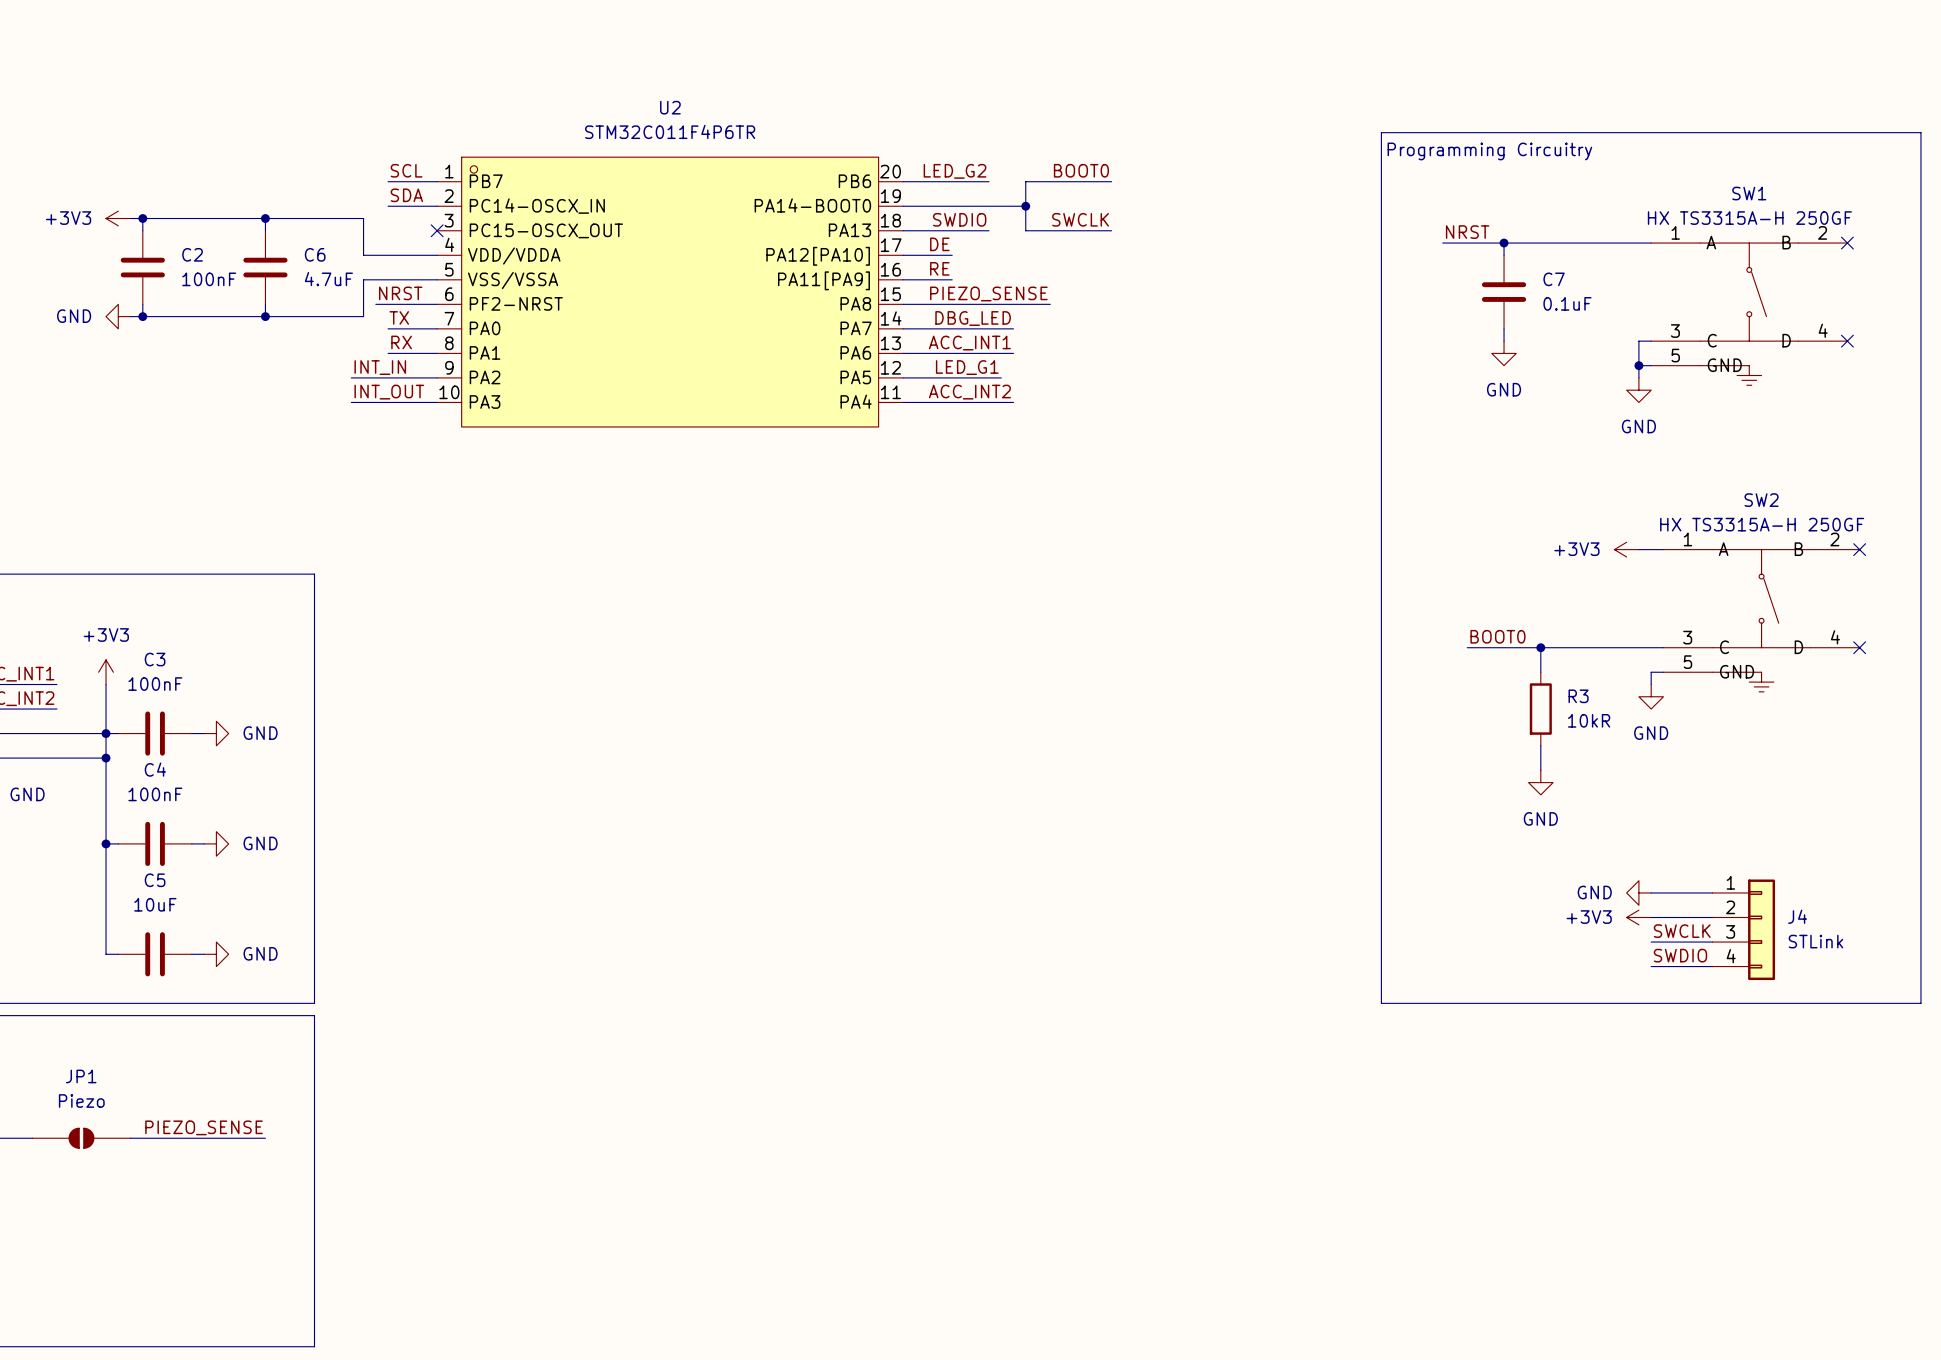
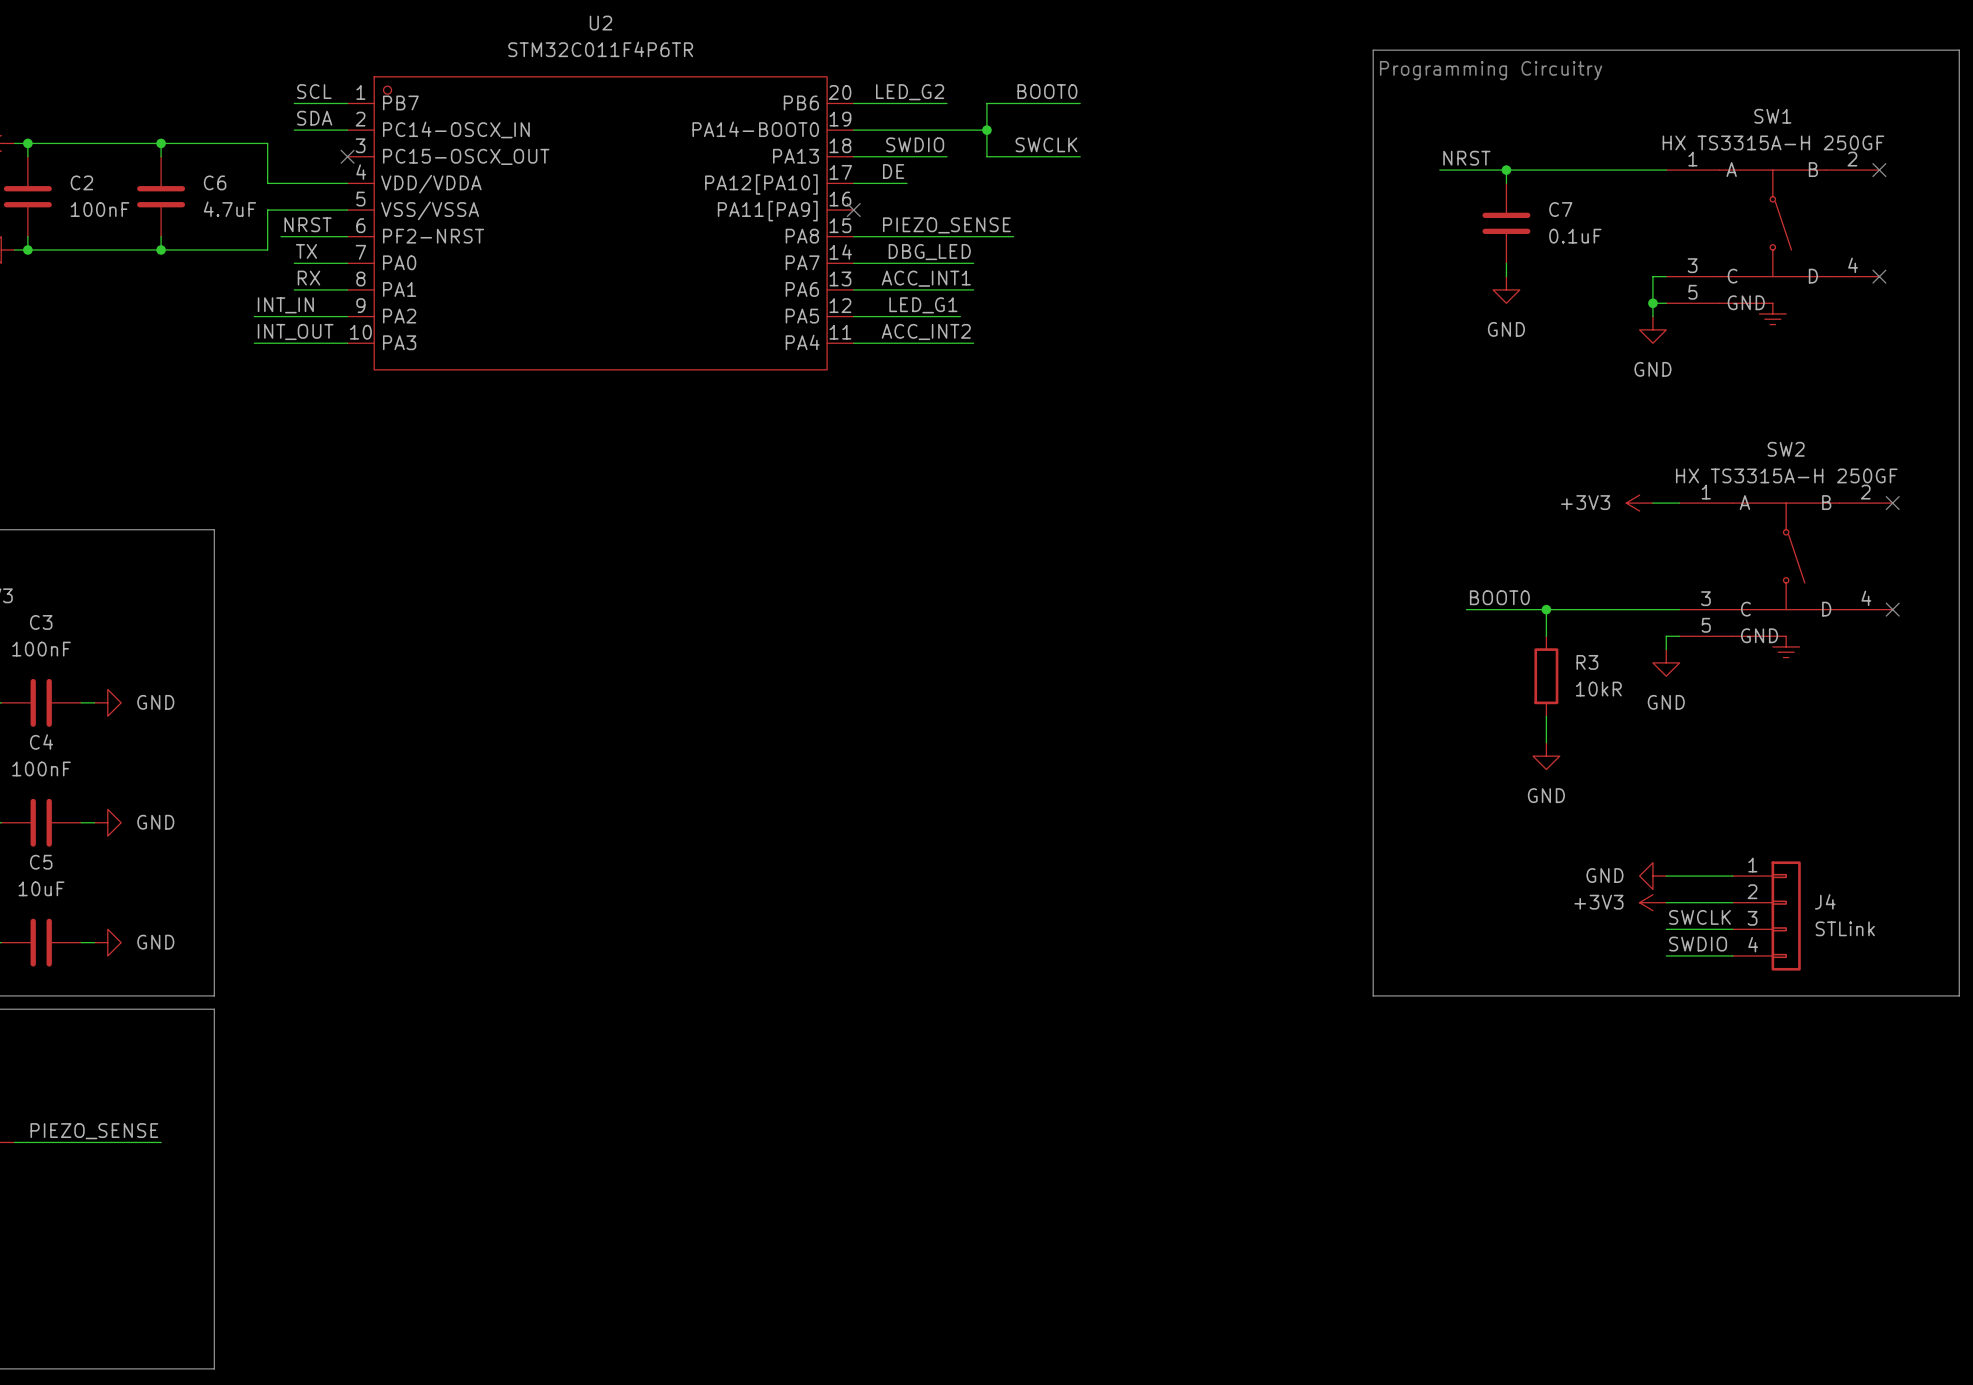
label: RE (939, 268) -> none
wire: (903, 279) (952, 279) -> none
no-connect mark: none -> (853, 210)

